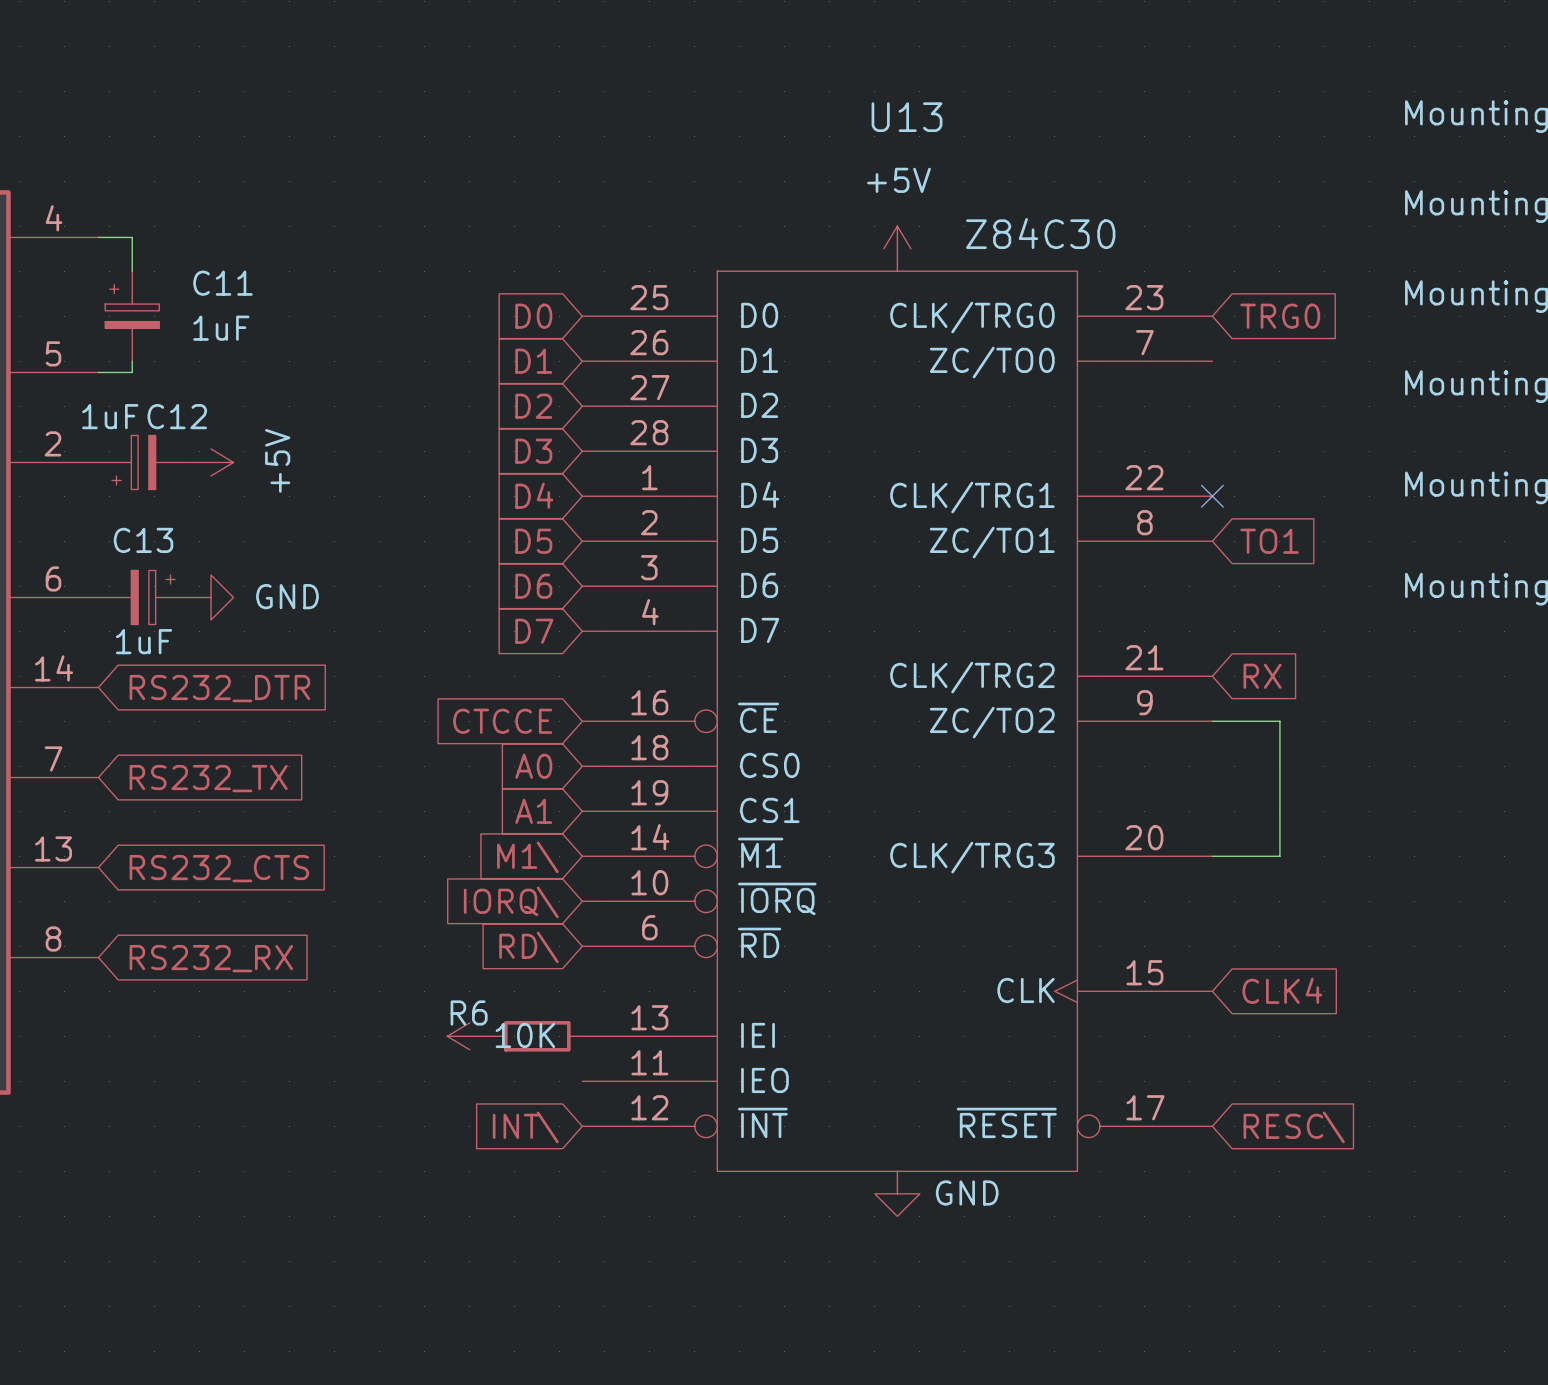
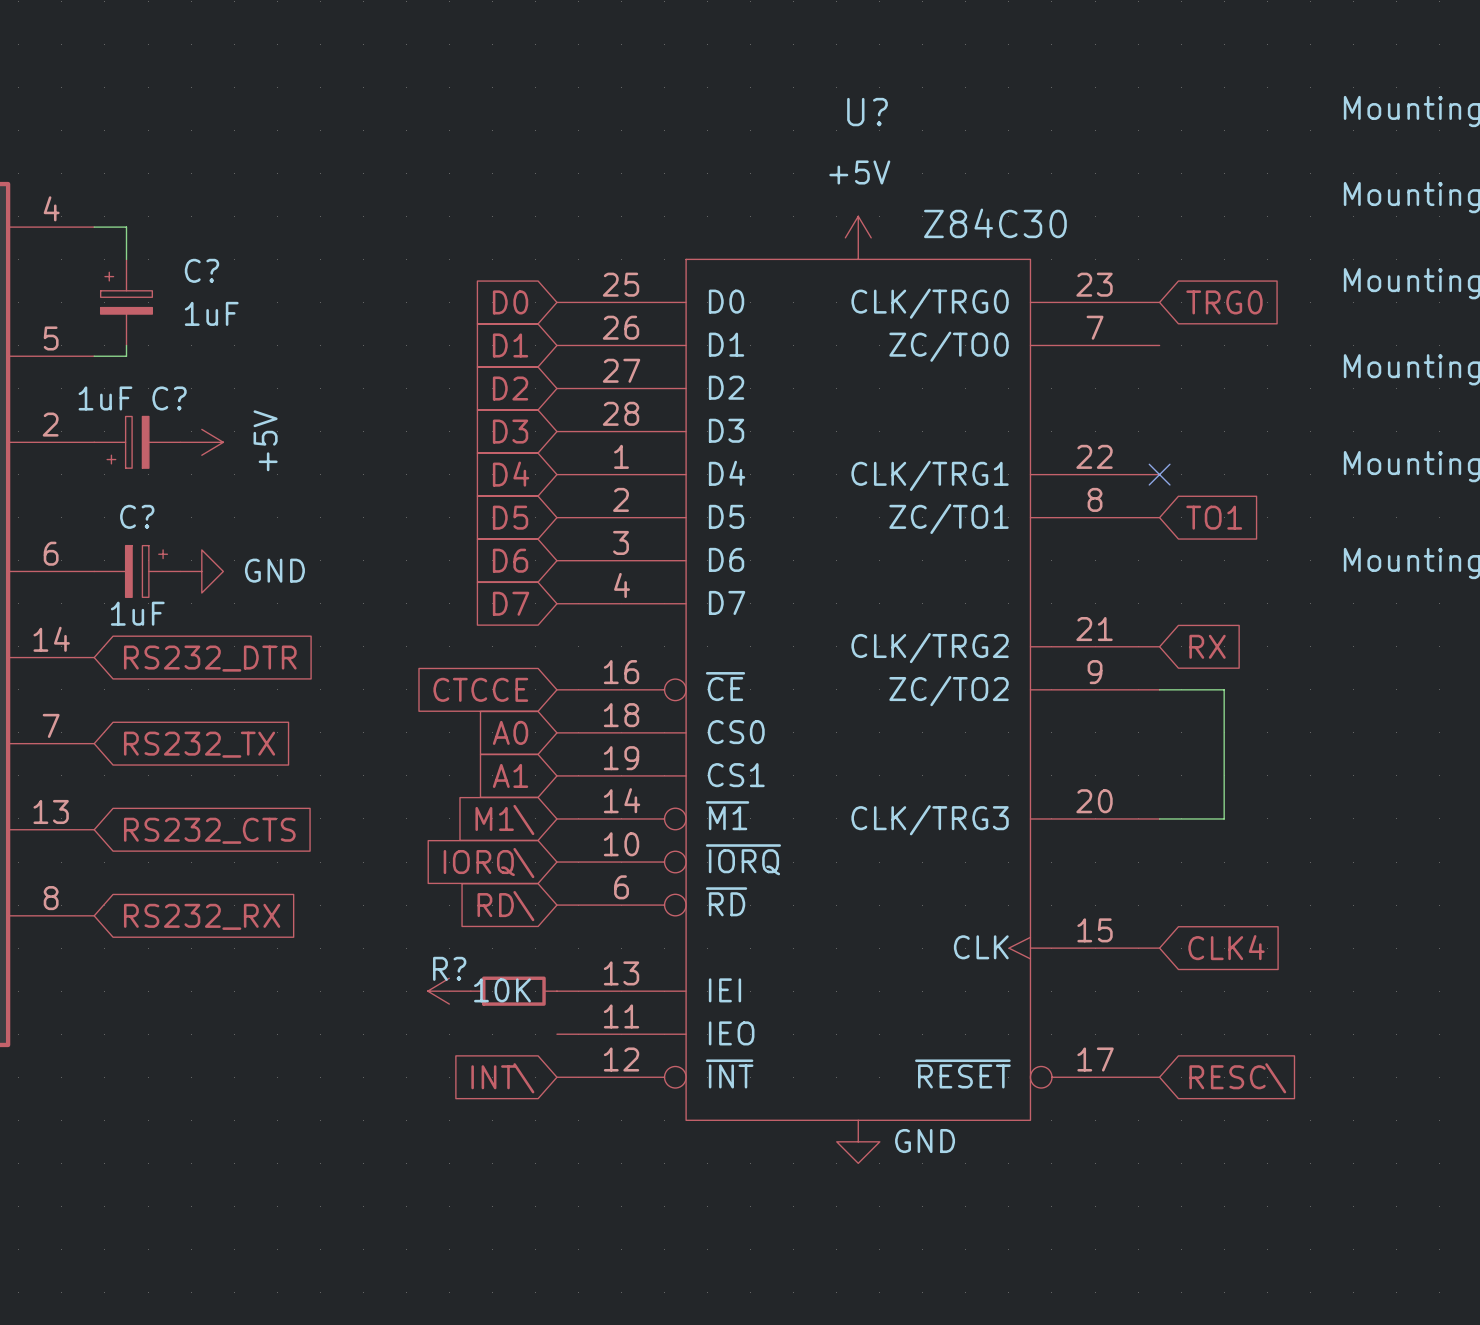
U13 name: U13 (907, 117) -> U? (867, 112)
C11 name: C11 (222, 283) -> C? (201, 270)
C12 name: C12 (177, 416) -> C? (169, 398)
C13 name: C13 (143, 540) -> C? (137, 516)
R6 name: R6 (469, 1012) -> R? (449, 968)

